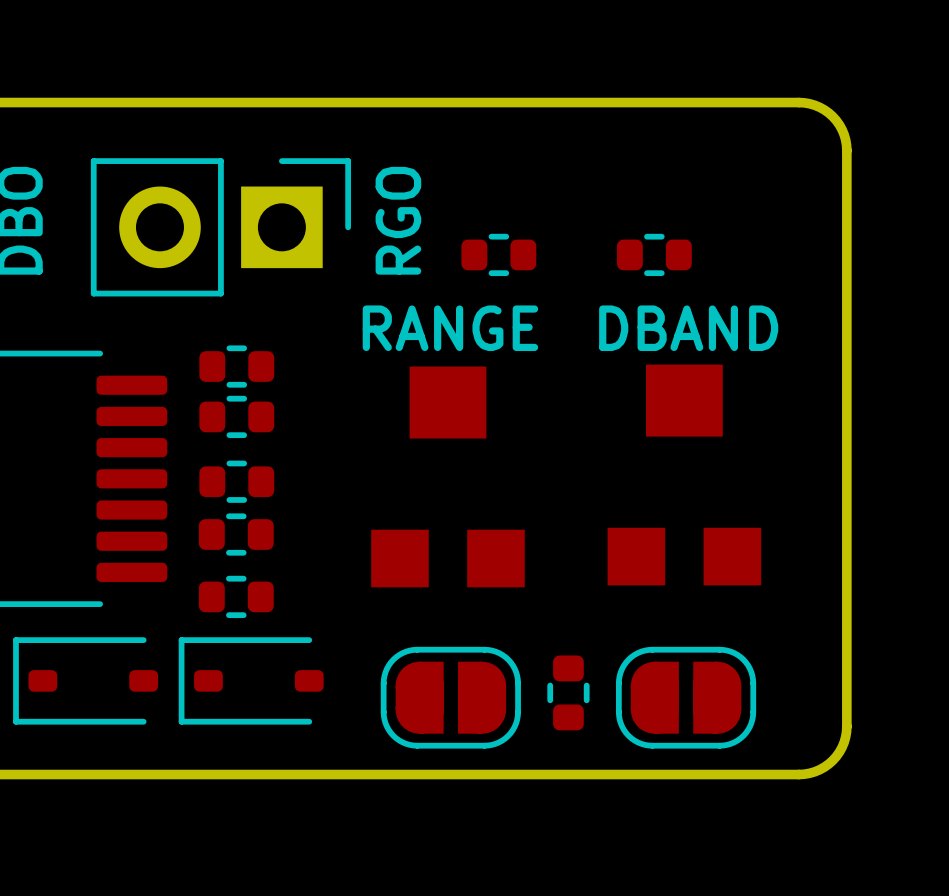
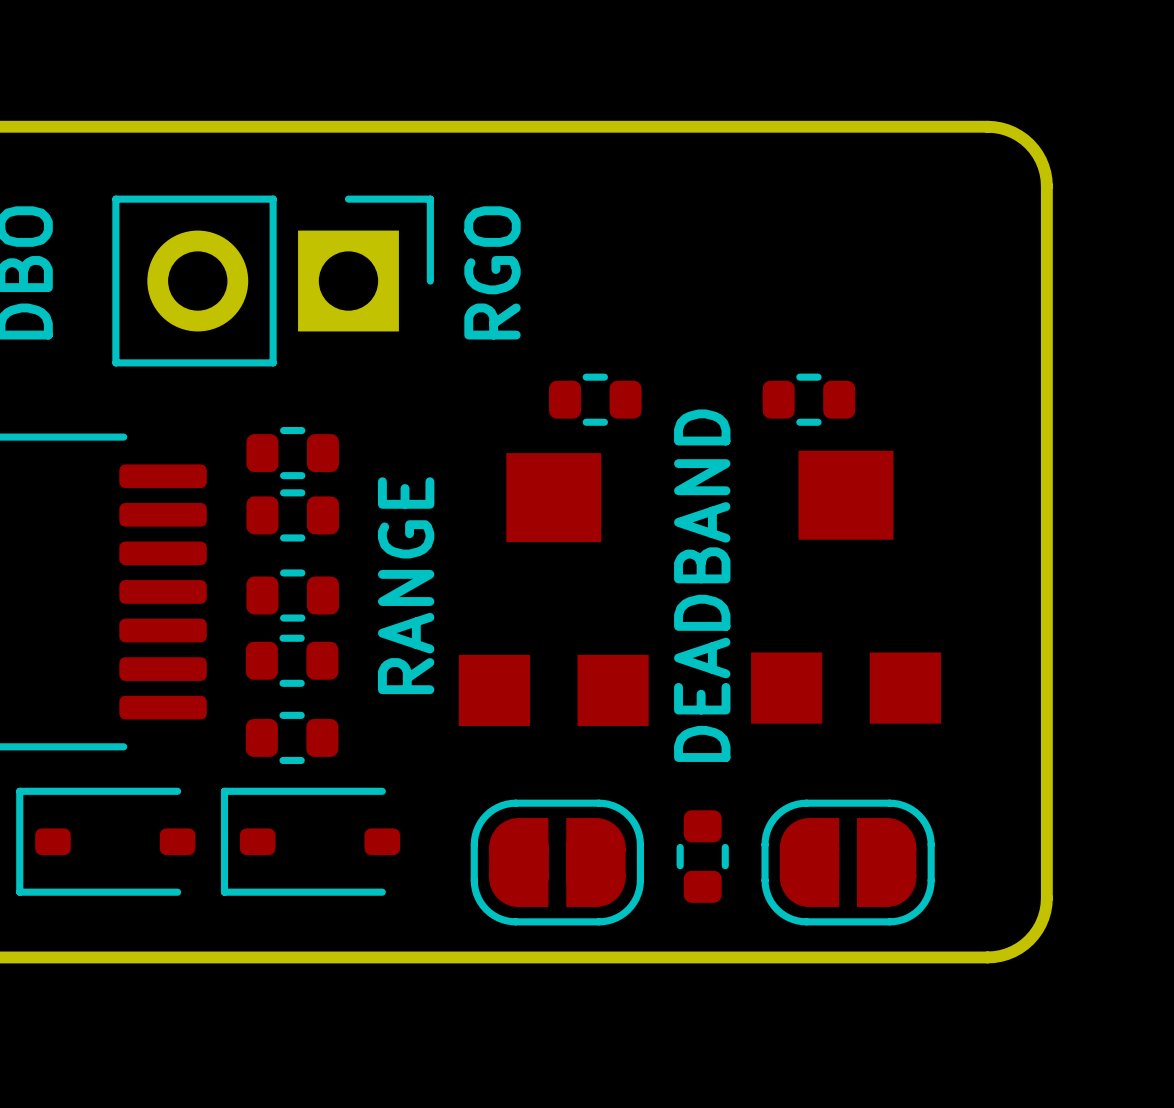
part position: (498, 254) -> (595, 399)
part position: (654, 254) -> (808, 399)
text rotation: 0° (450, 328) -> 90° counterclockwise (406, 585)
text: DBAND (688, 328) -> DEADBAND (702, 585)

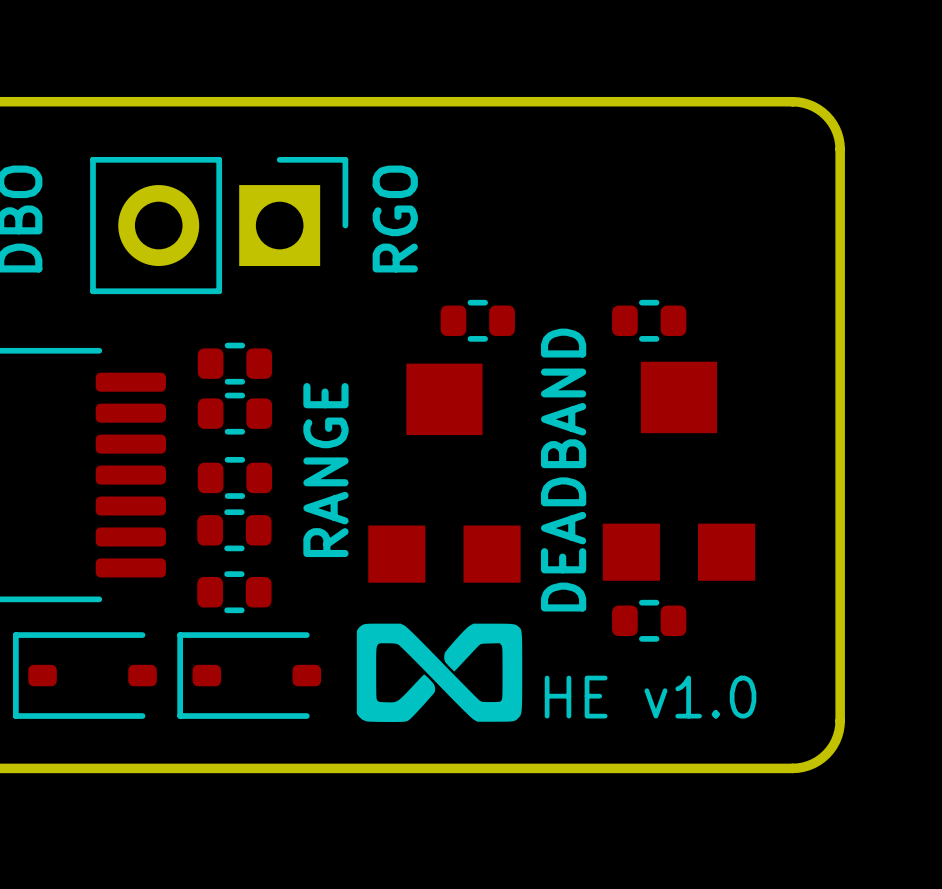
drawing: none -> [356, 623, 523, 723]
part rotation: 0° (702, 856) -> 90° clockwise (649, 620)
part position: (702, 856) -> (649, 620)
part: (557, 862) -> none
part: (848, 862) -> none
text: none -> HE v1.0 (650, 697)

